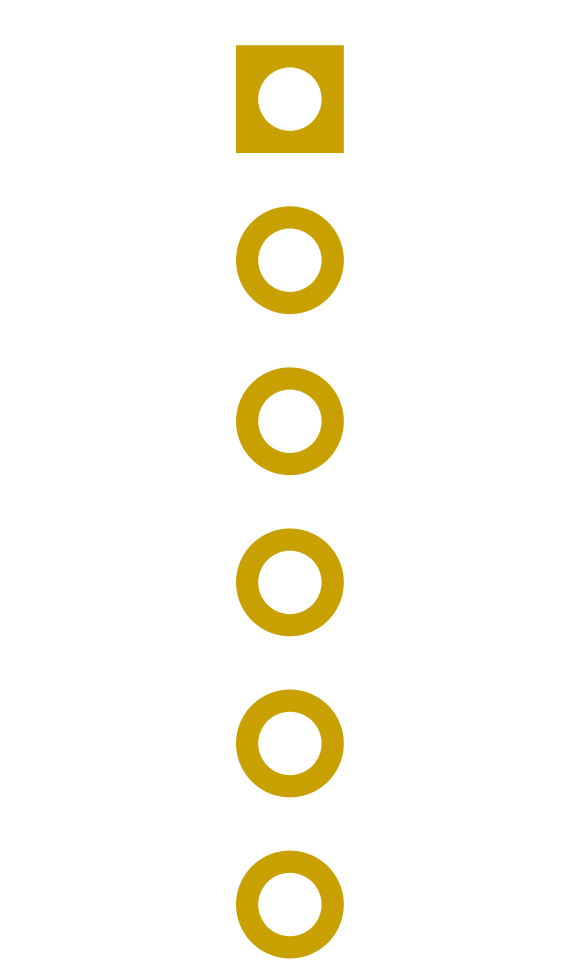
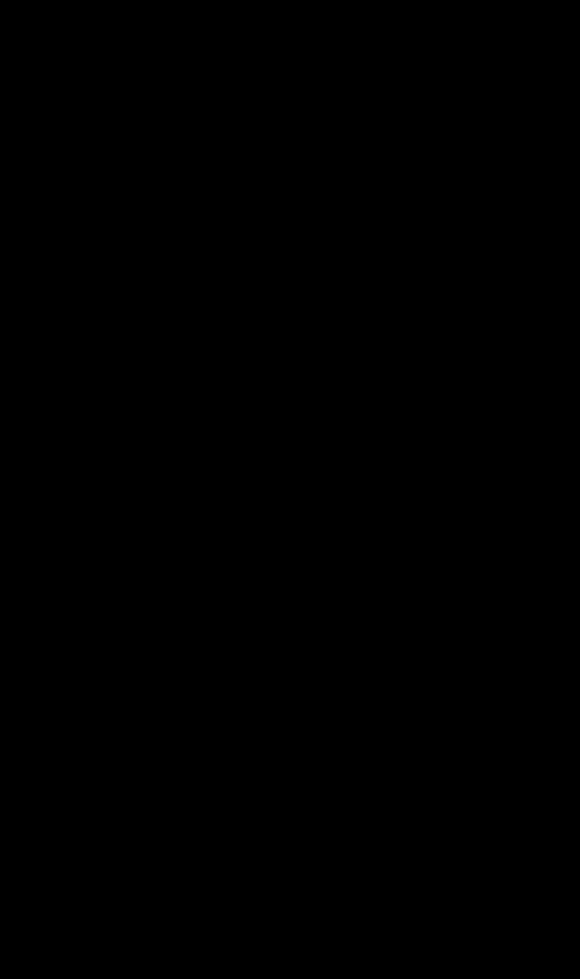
part: (289, 501) -> none

